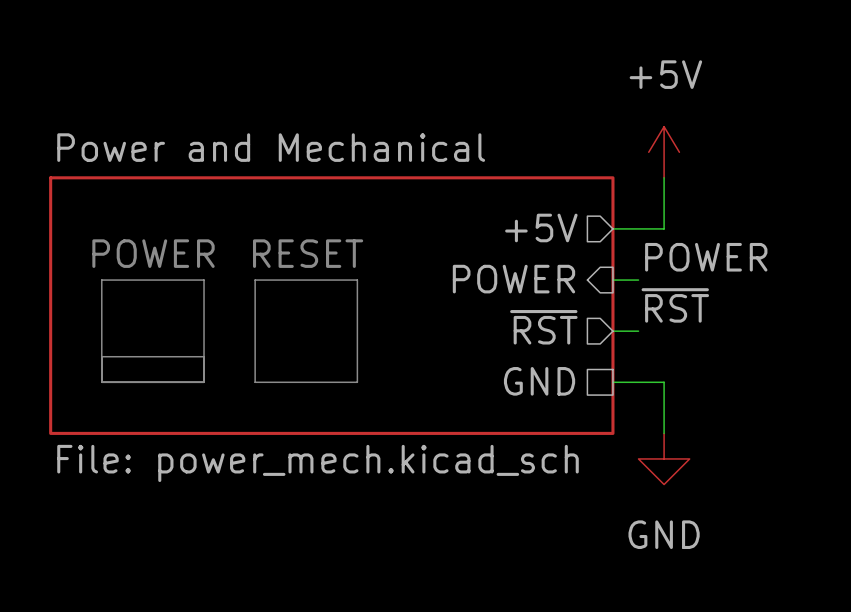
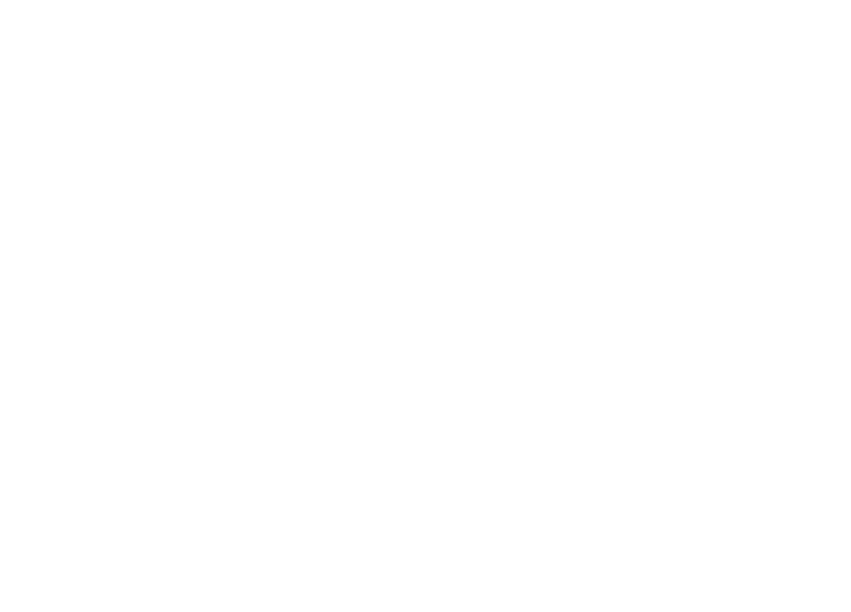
power symbol: +5V (664, 152) -> none
wire: (664, 177) (664, 228) (612, 228) -> none
sheet pin: +5V (541, 227) -> none
text: POWER (153, 253) -> none
text: RESET (308, 253) -> none
label: POWER (706, 257) -> none
sheet pin: POWER (513, 279) -> none
line: (101, 280) (101, 382) (204, 382) (204, 280) (101, 280) -> none
line: (255, 280) (357, 280) (357, 382) (255, 382) (255, 280) -> none
wire: (612, 280) (638, 280) -> none
sheet Power and Mechanical: File: power_mech.kicad_sch (331, 305) -> none
label: ~{RST} (675, 305) -> none
sheet pin: ~{RST} (543, 327) -> none
wire: (612, 331) (638, 331) -> none
line: (101, 356) (204, 356) -> none
sheet pin: GND (539, 381) -> none
wire: (612, 382) (664, 382) (664, 433) -> none
power symbol: GND (664, 458) -> none

